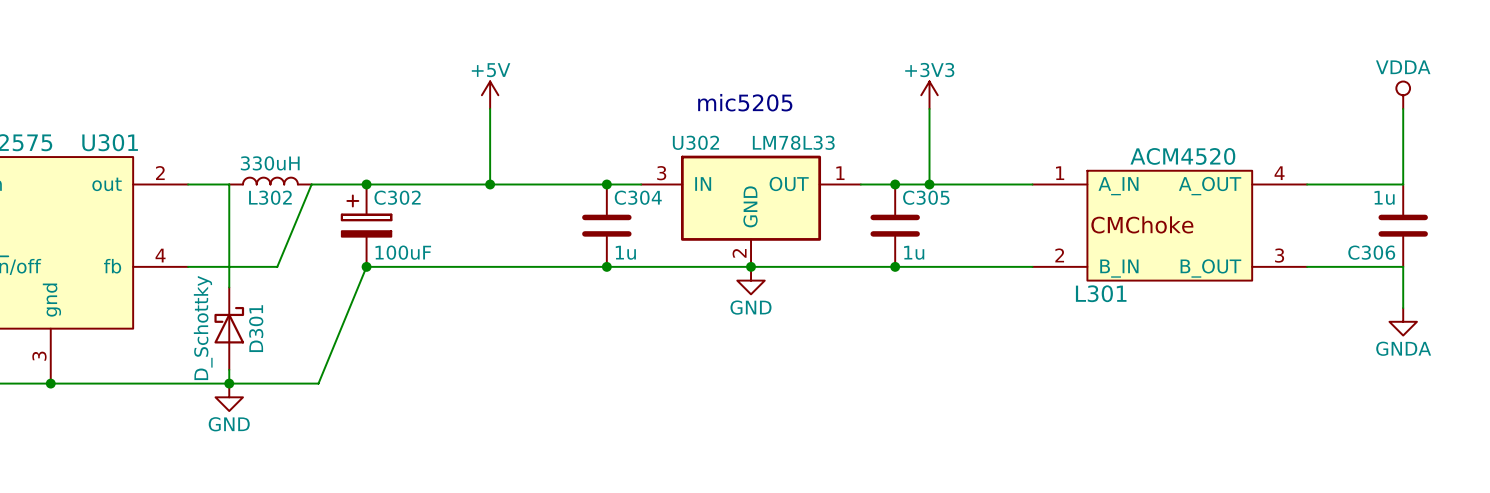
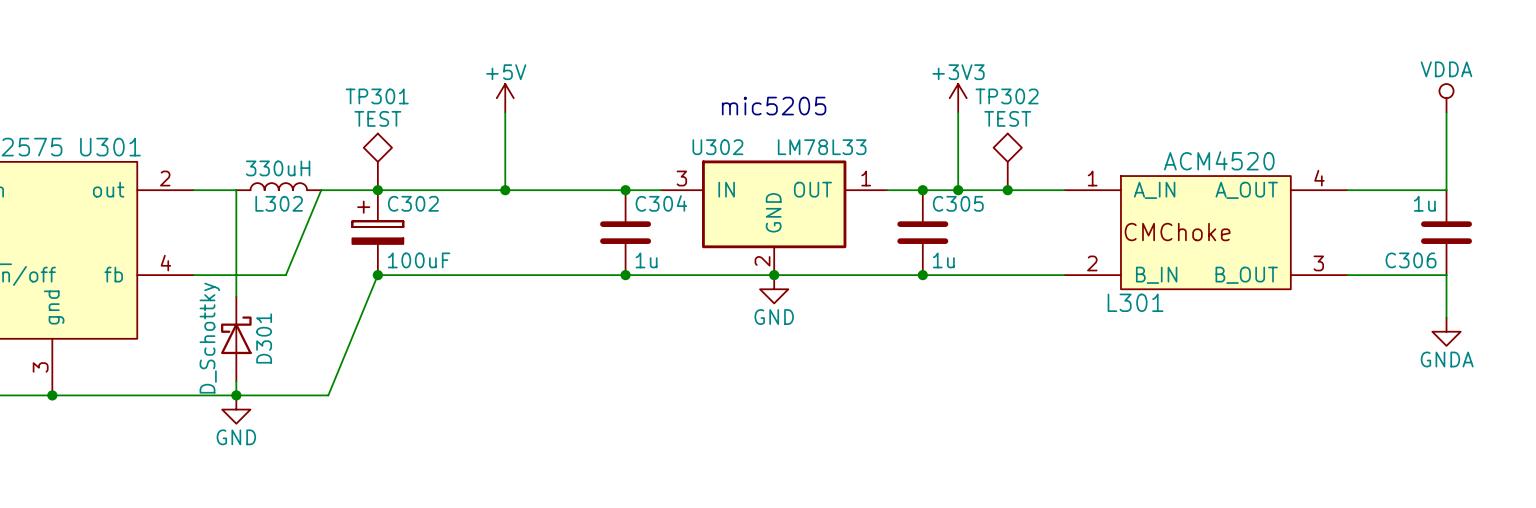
TP301: none -> TEST (377, 161)
TP302: none -> TEST (1007, 161)
junction: none -> (1007, 190)

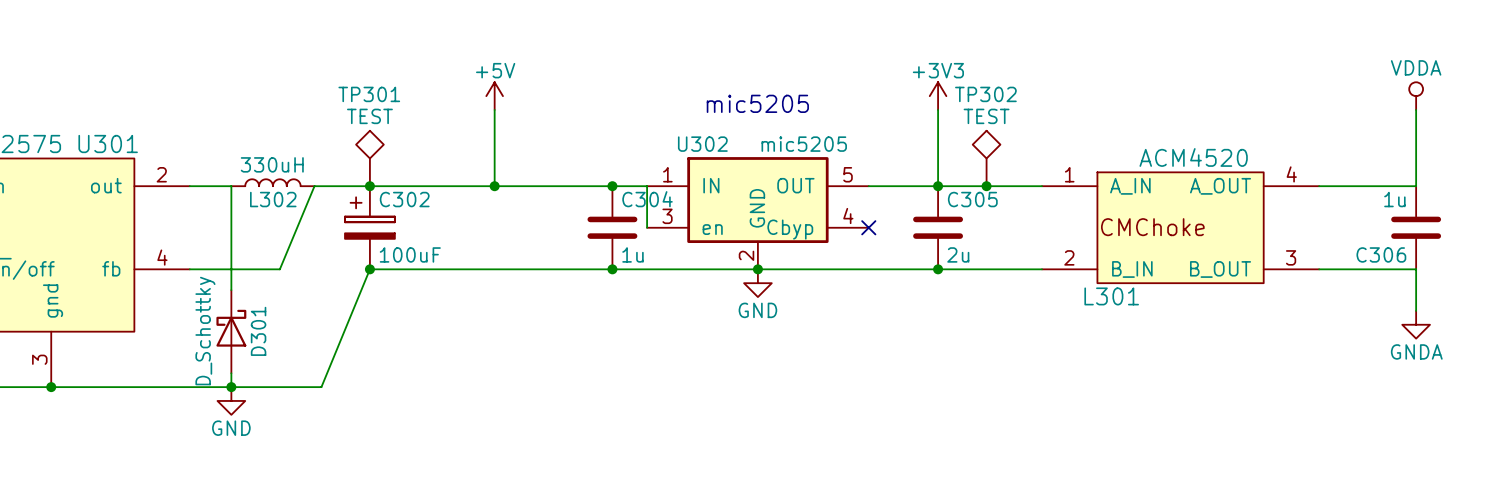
U302 value: LM78L33 (822, 147) -> mic5205 (804, 144)
U302 symbol: [660, 160, 888, 276] -> [647, 157, 869, 270]
wire: none -> (647, 186) (647, 227)
junction: (922, 190) -> none
no-connect mark: none -> (868, 227)
C305 position: (922, 232) -> (938, 227)
C305 value: 1u (943, 260) -> 2u (958, 254)
junction position: (922, 275) -> (938, 269)

